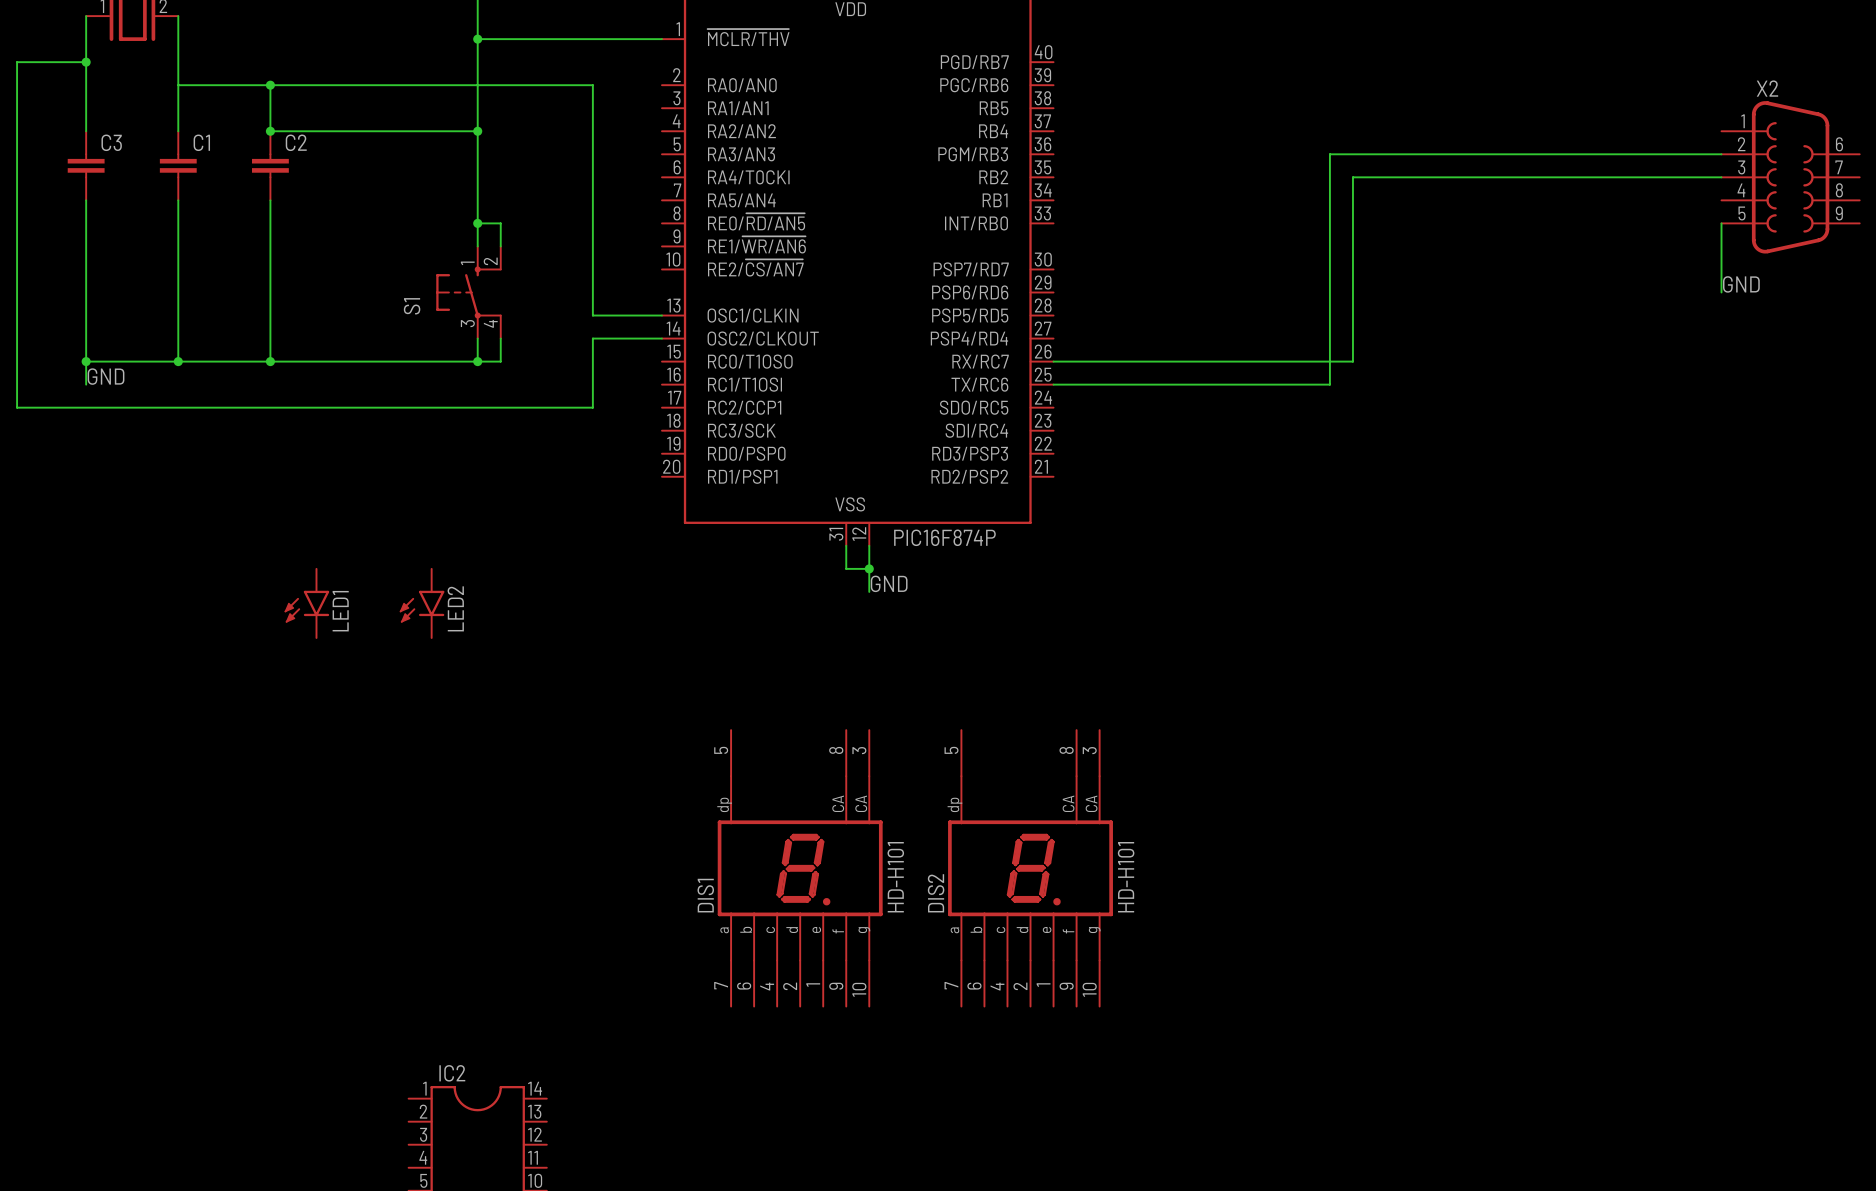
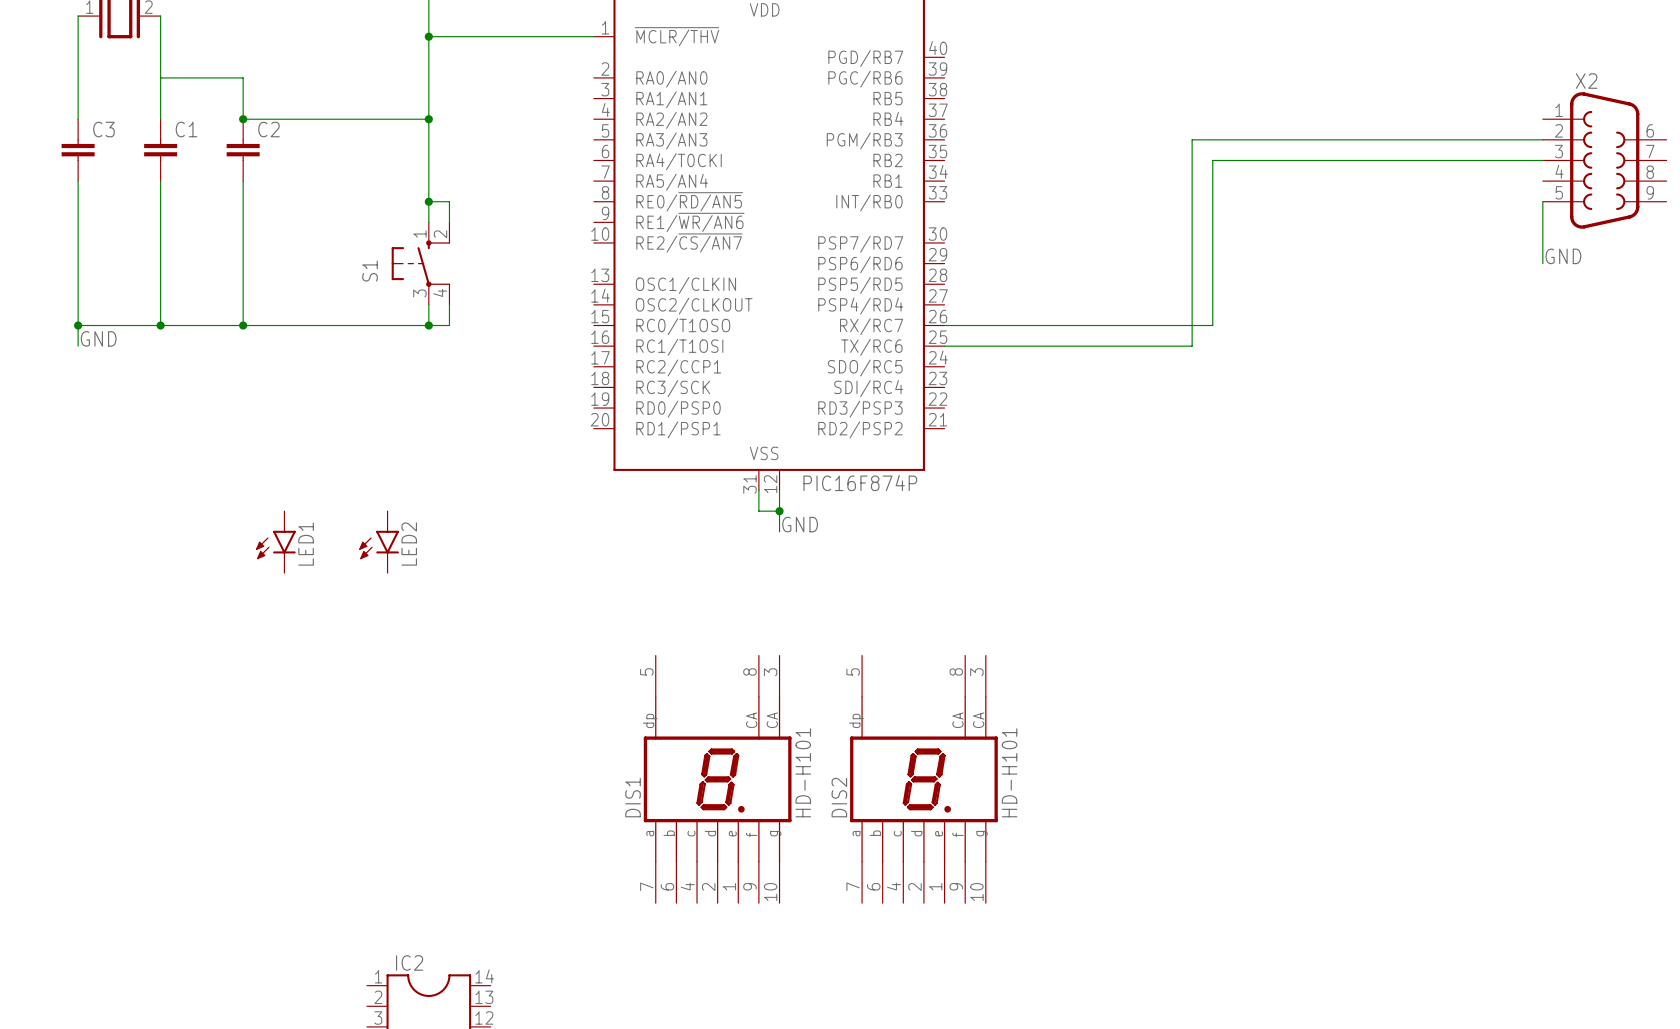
wire: (86, 62) (17, 62) (17, 407) (592, 407) (592, 338) (661, 338) -> none
junction: (86, 62) -> none
wire: (270, 85) (592, 85) (592, 315) (661, 315) -> none
junction: (270, 85) -> none

